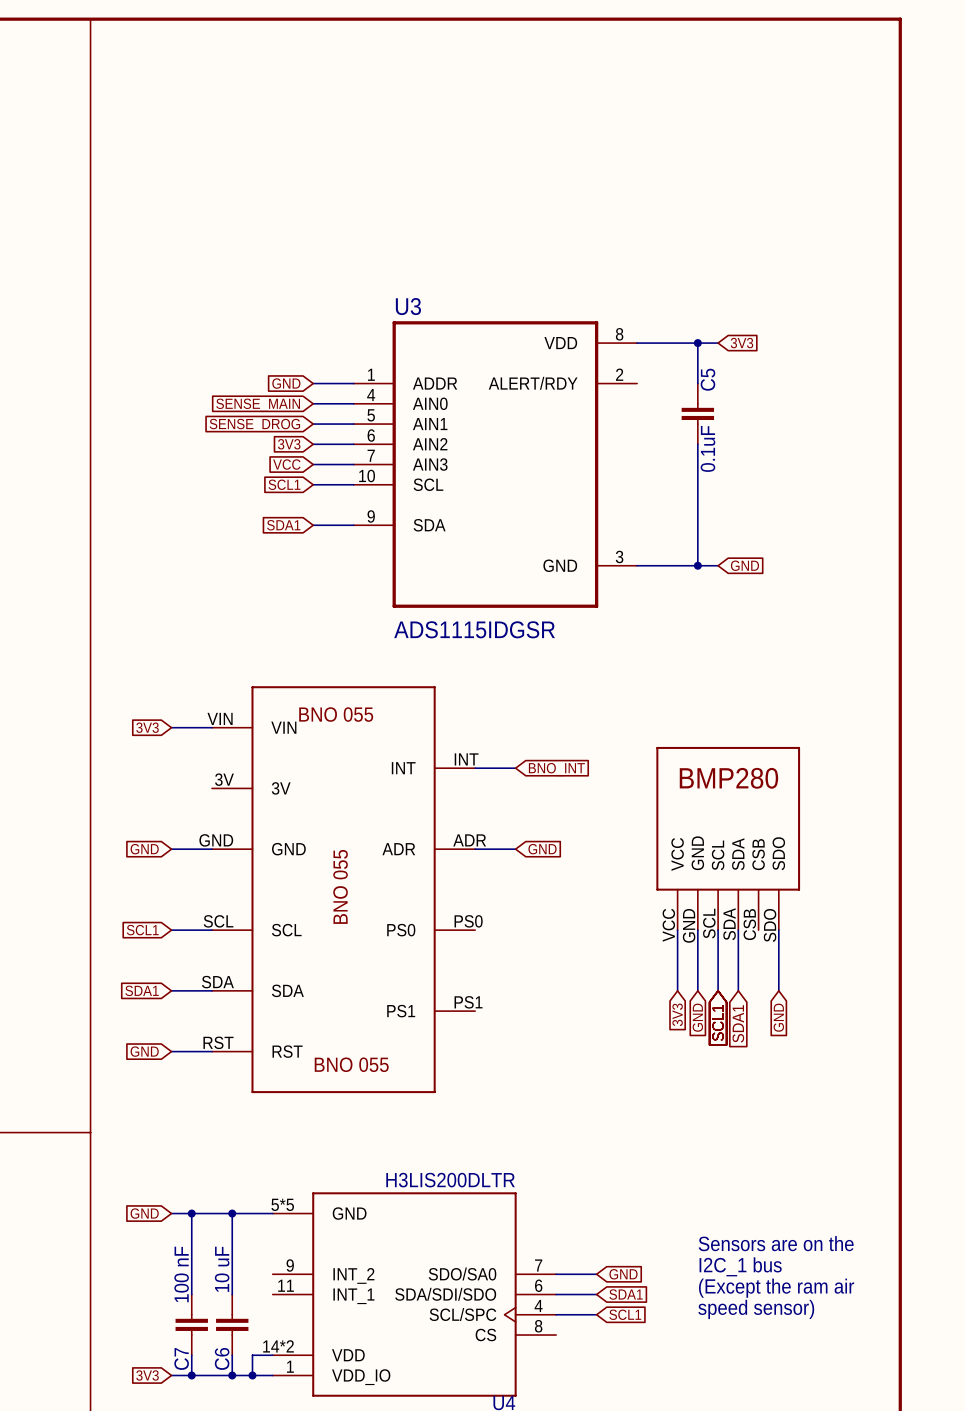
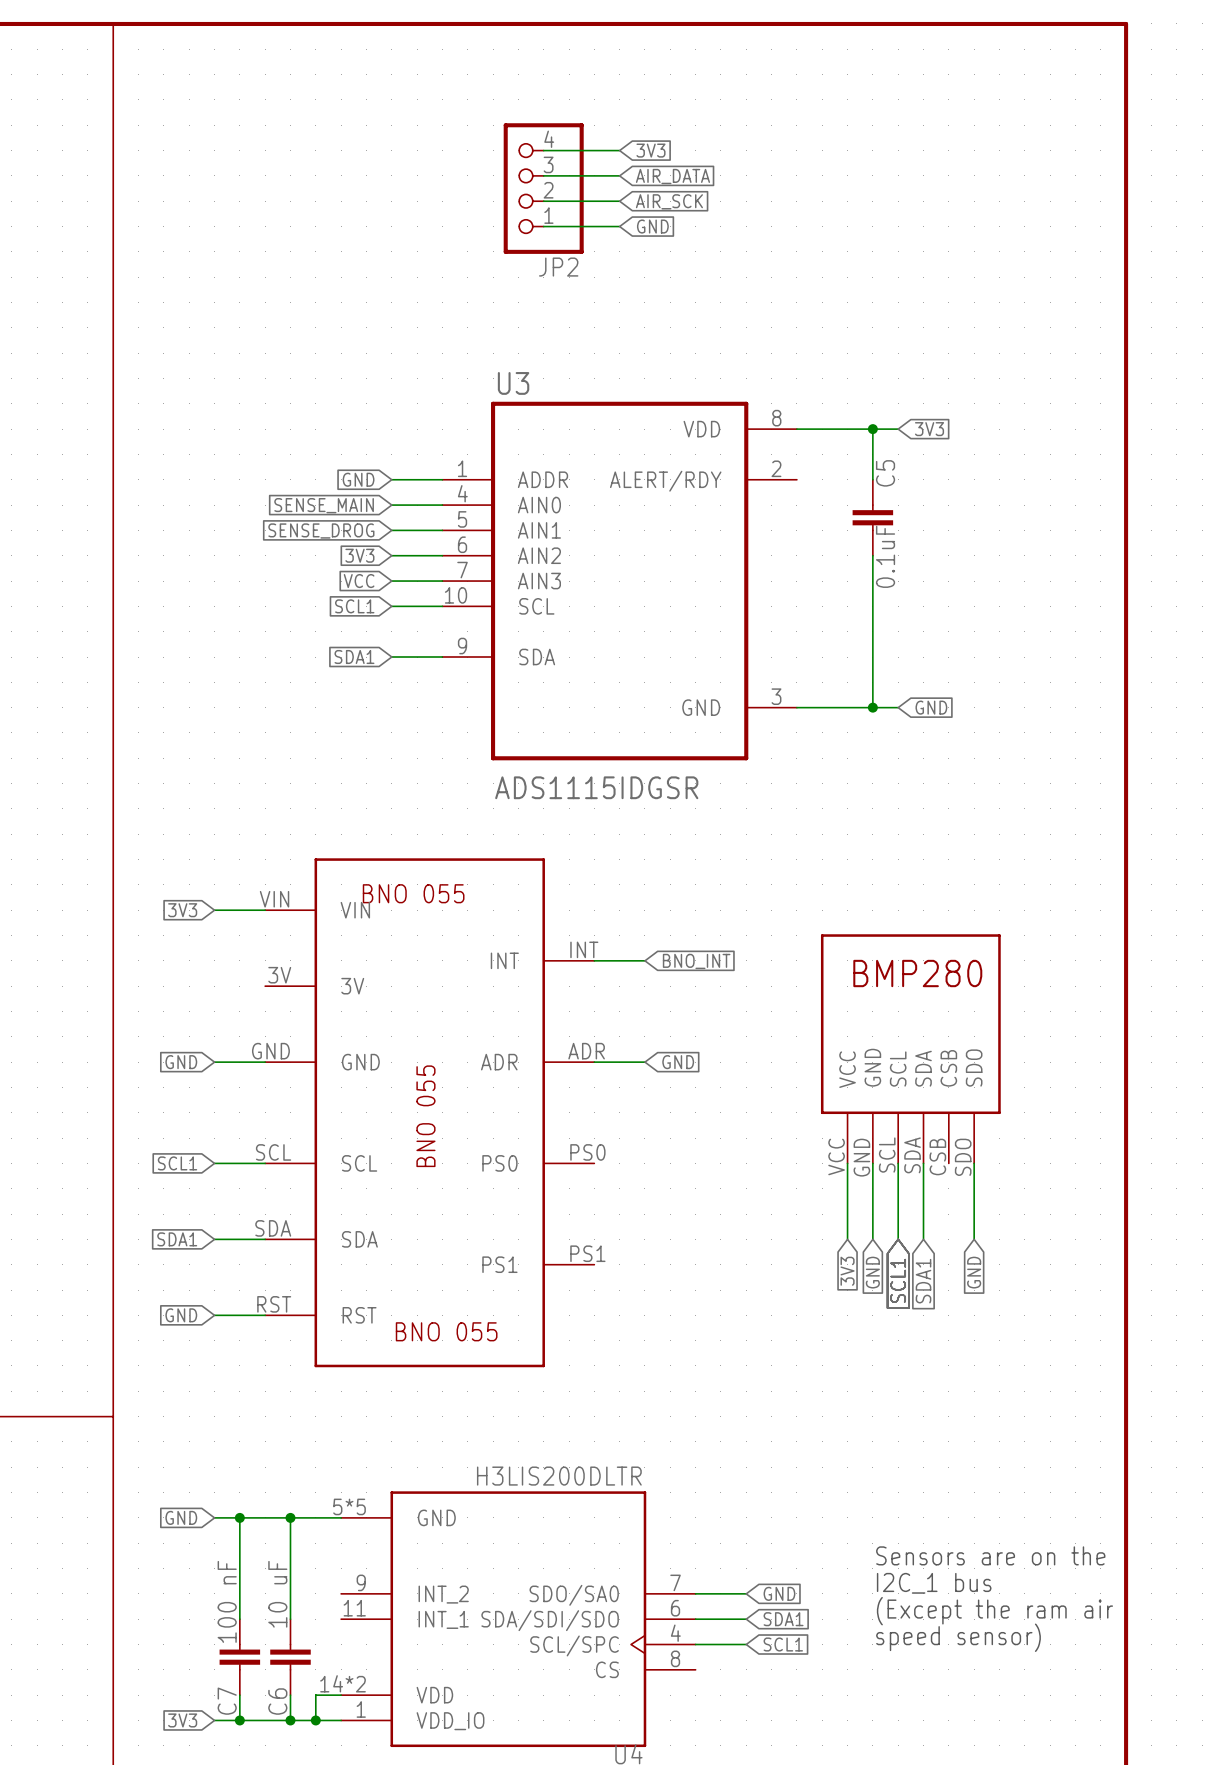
wire: none -> (543, 150) (619, 150)
global label: none -> 3V3 (650, 150)
wire: none -> (543, 175) (619, 175)
global label: none -> AIR_DATA (672, 176)
JP2: none -> (543, 188)
wire: none -> (543, 201) (619, 201)
global label: none -> AIR_SCK (669, 201)
wire: none -> (543, 226) (619, 226)
global label: none -> GND (652, 226)

